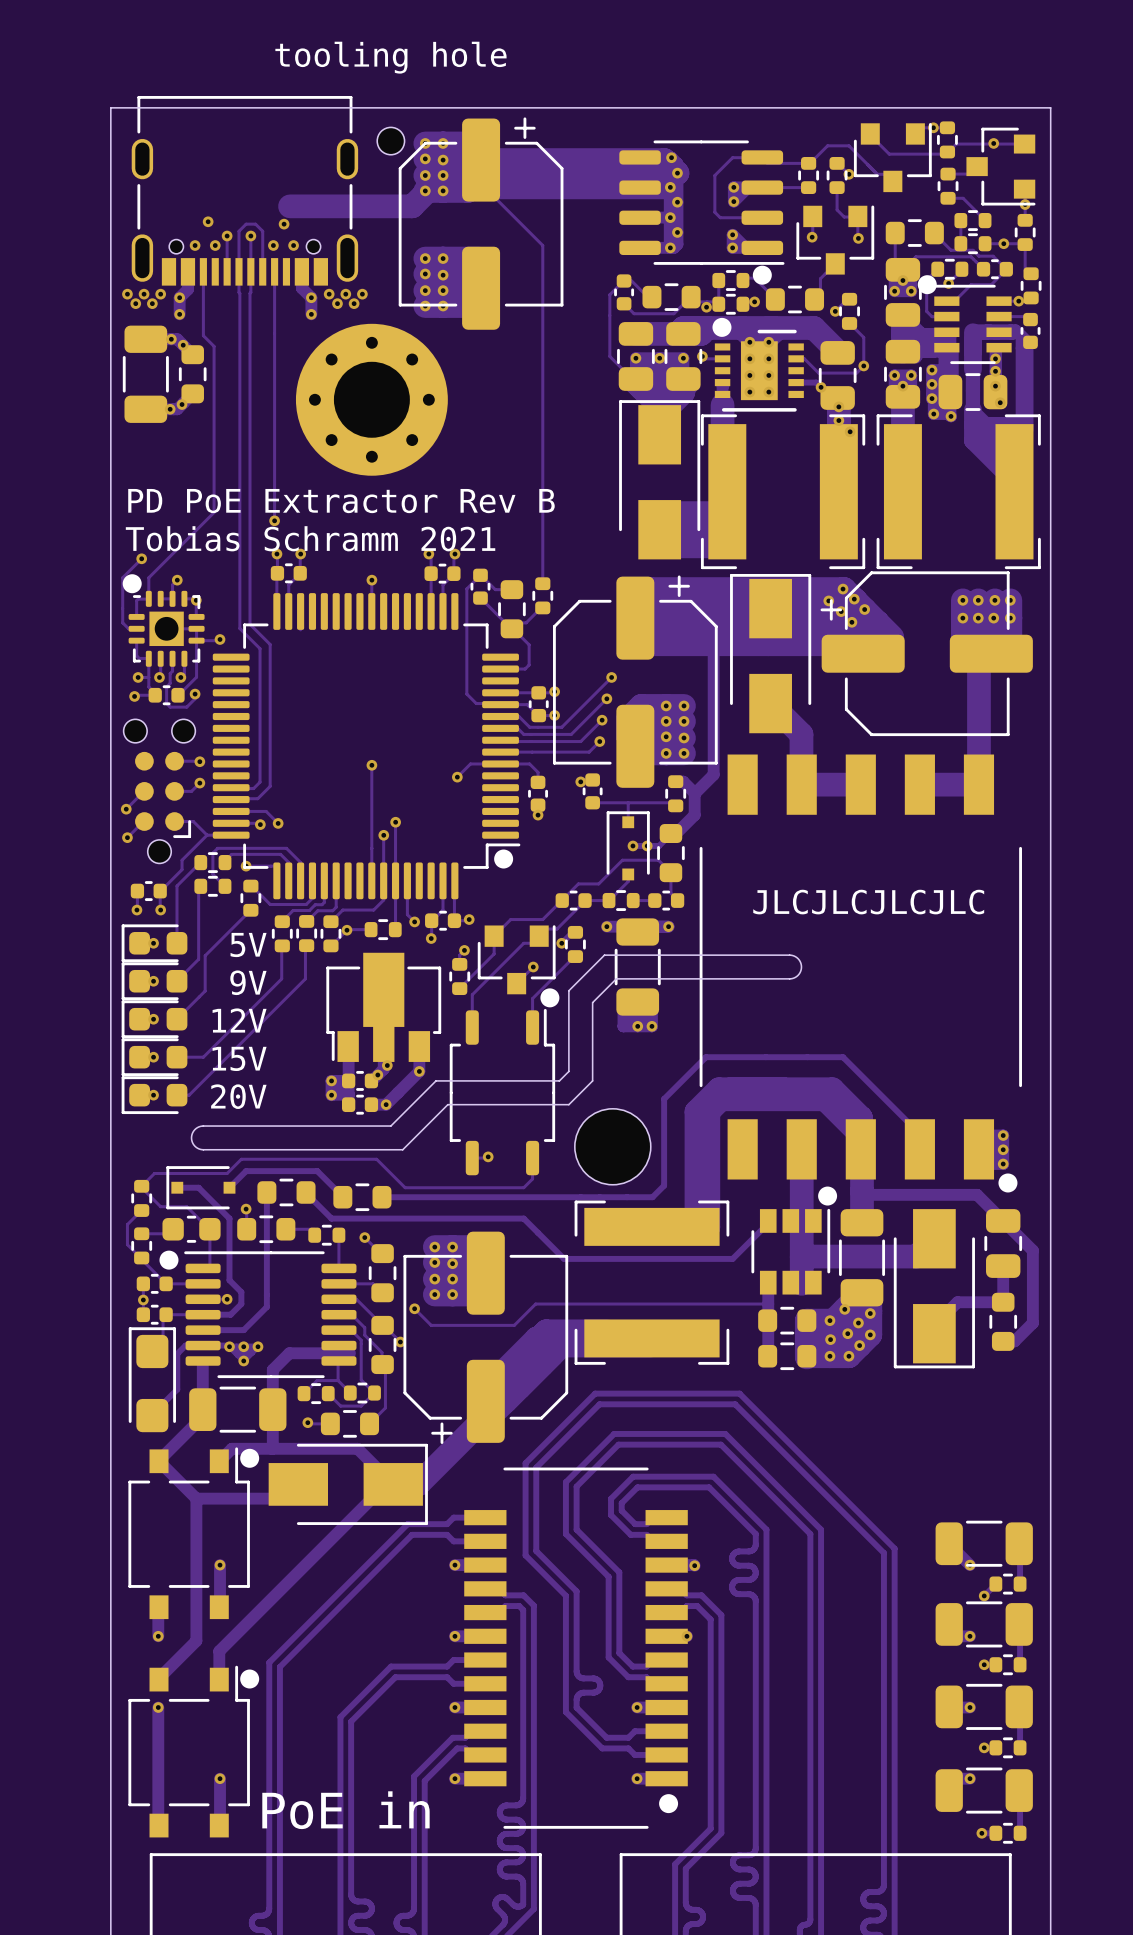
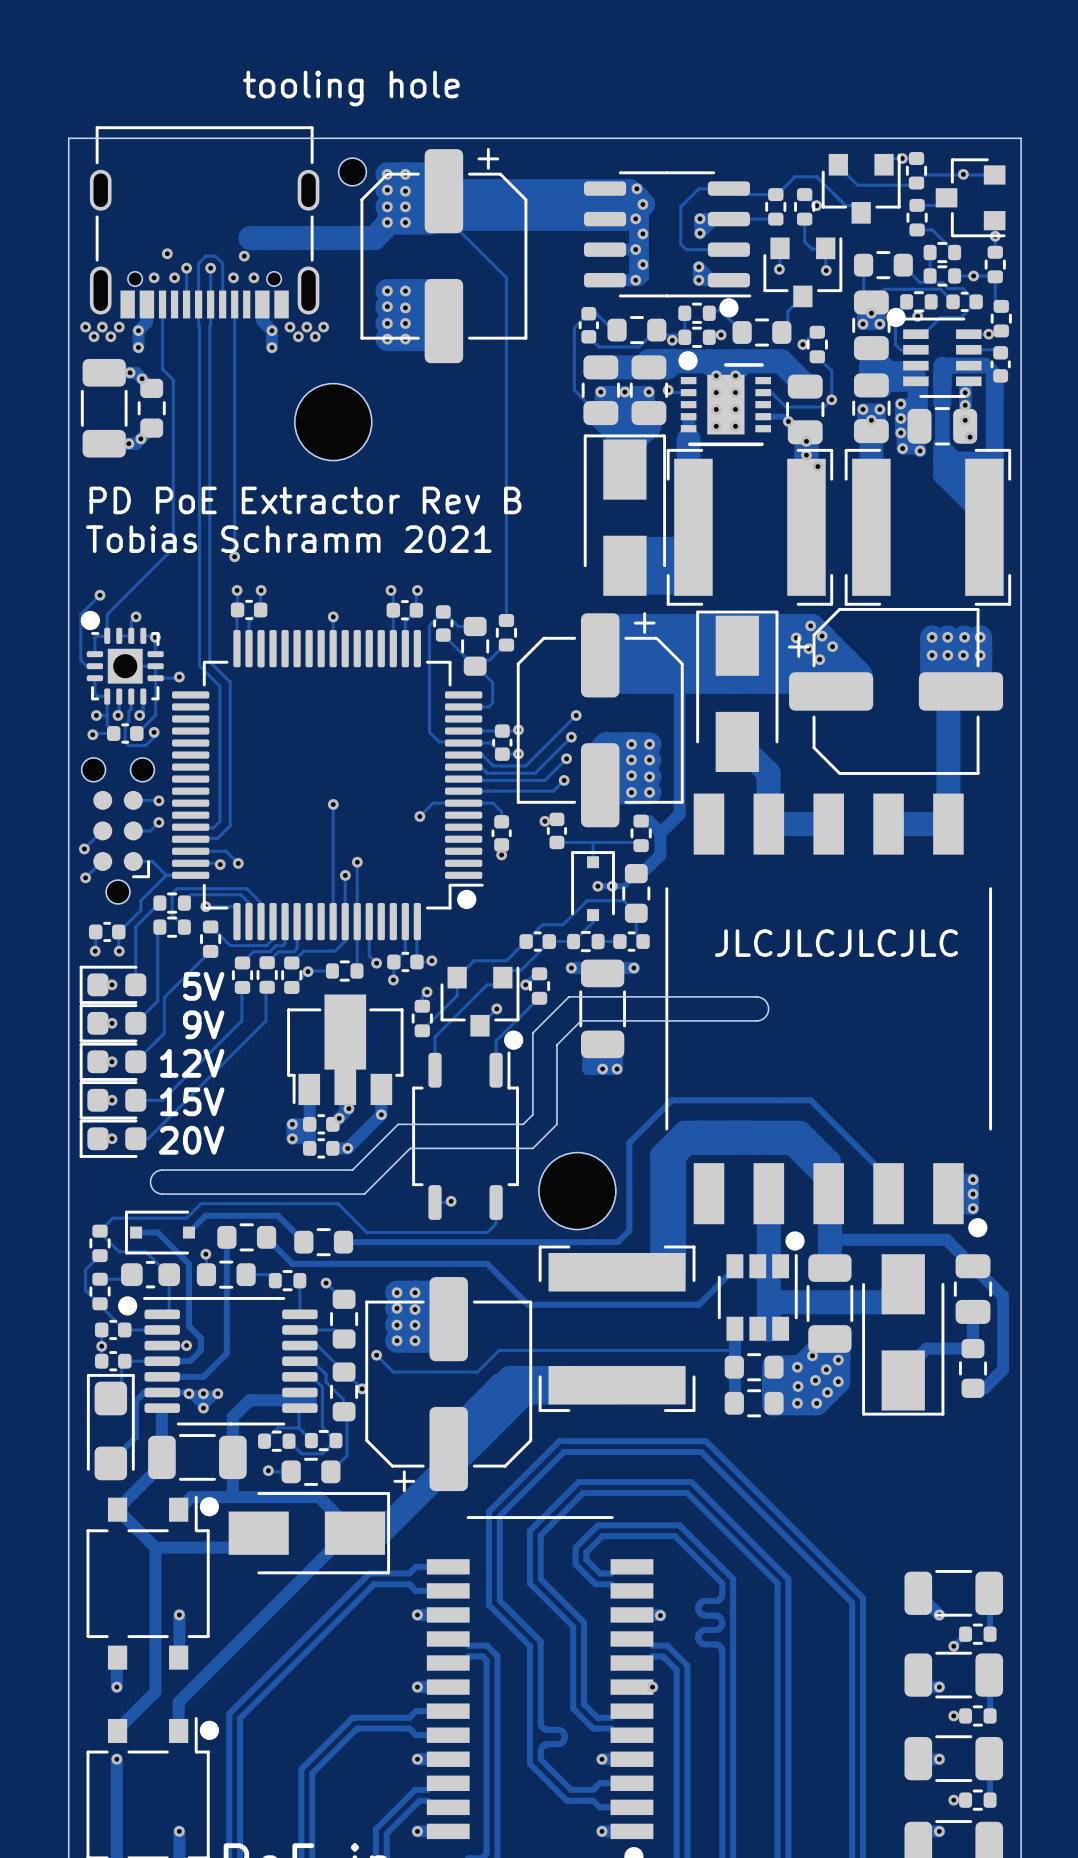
part footprint: [295, 323, 448, 476] -> [294, 383, 372, 461]
text: none -> PD PoE Extractor Rev B (305, 500)
text: PD PoE Extractor Rev B (341, 501) -> Tobias Schramm 2021 (288, 539)
text: Tobias Schramm 2021 (310, 538) -> none

